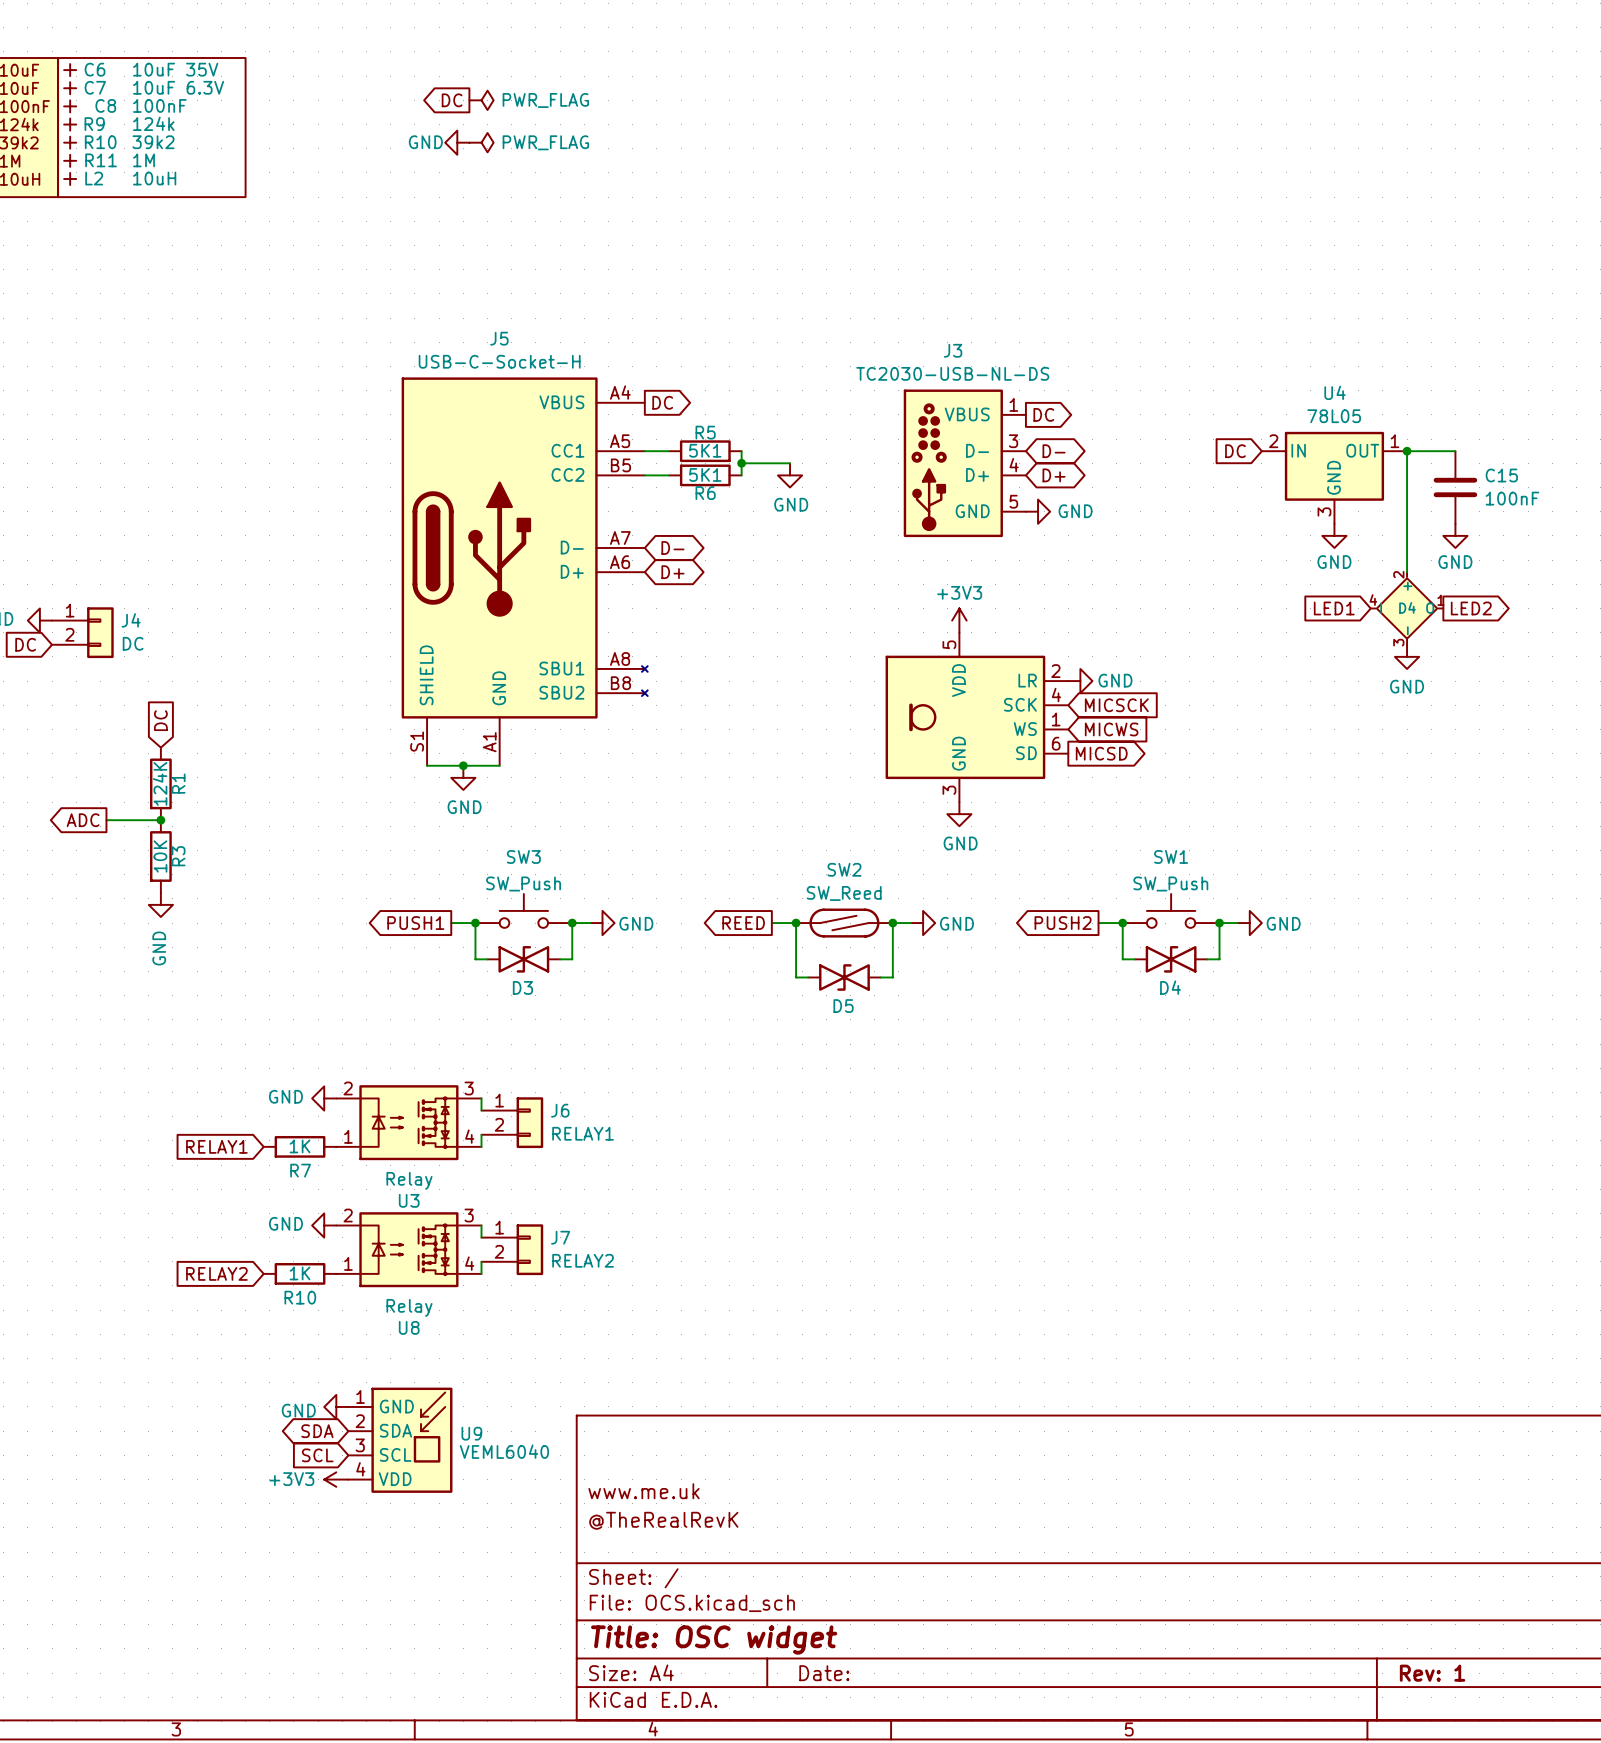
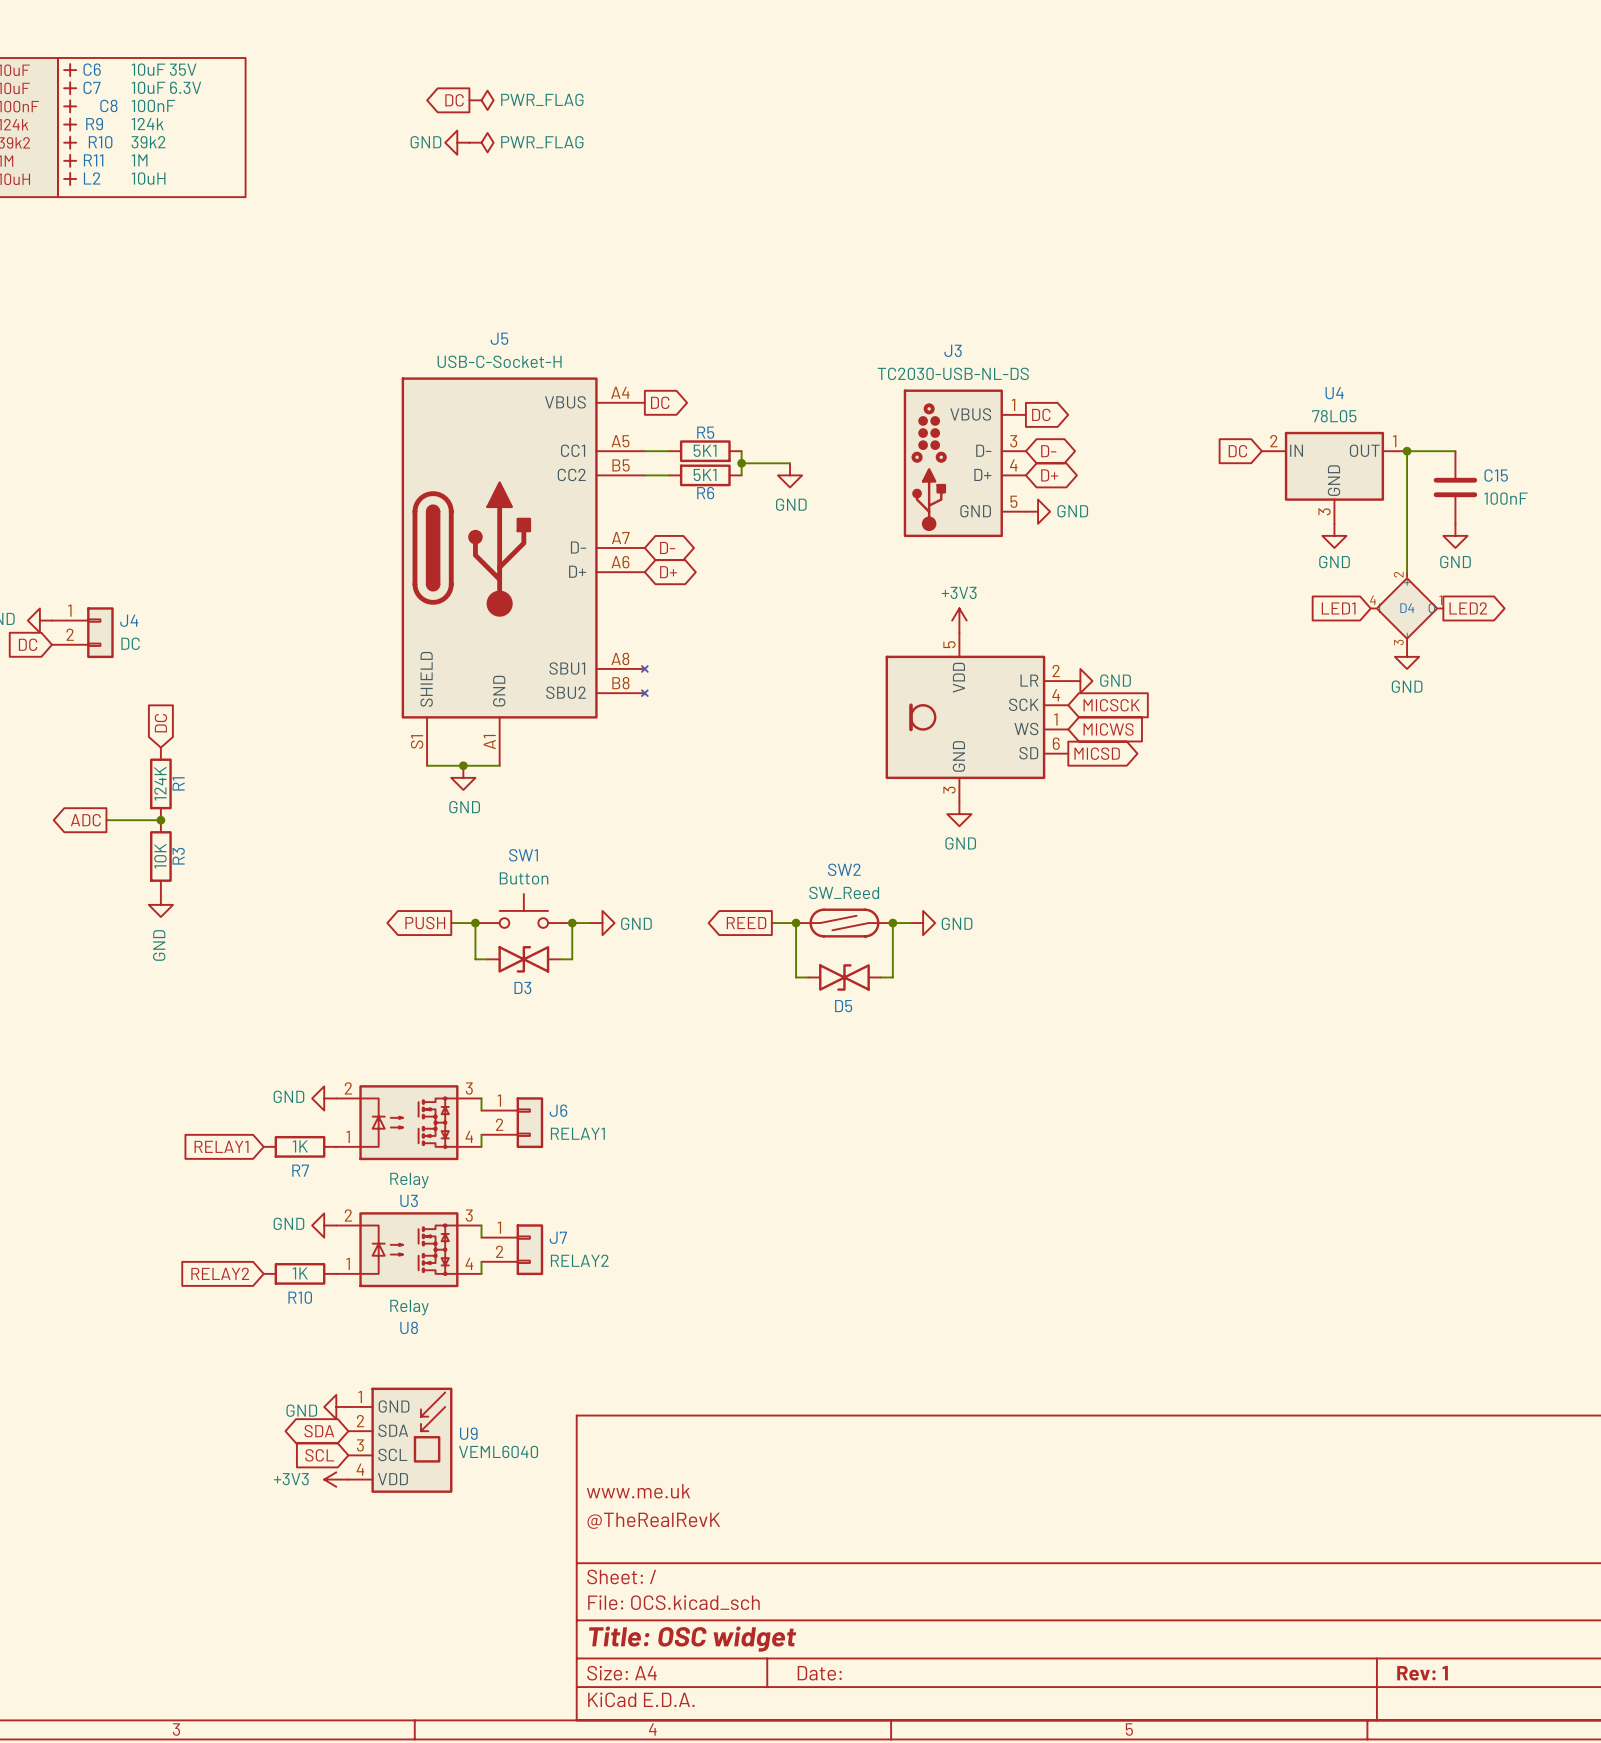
SW3 name: SW3 (523, 856) -> SW1 (523, 855)
SW3 value: SW_Push (523, 883) -> Button (524, 878)
SW1: SW_Push (1171, 910) -> none
global label: PUSH1 (415, 923) -> PUSH (425, 923)
global label: PUSH2 (1063, 923) -> none
wire: (1098, 923) (1122, 923) (1122, 959) (1134, 959) -> none
junction: (1122, 923) -> none
junction: (1219, 923) -> none
wire: (1237, 923) (1219, 923) (1219, 959) (1207, 959) -> none
power symbol: GND (1249, 923) -> none
D4: (1171, 959) -> none

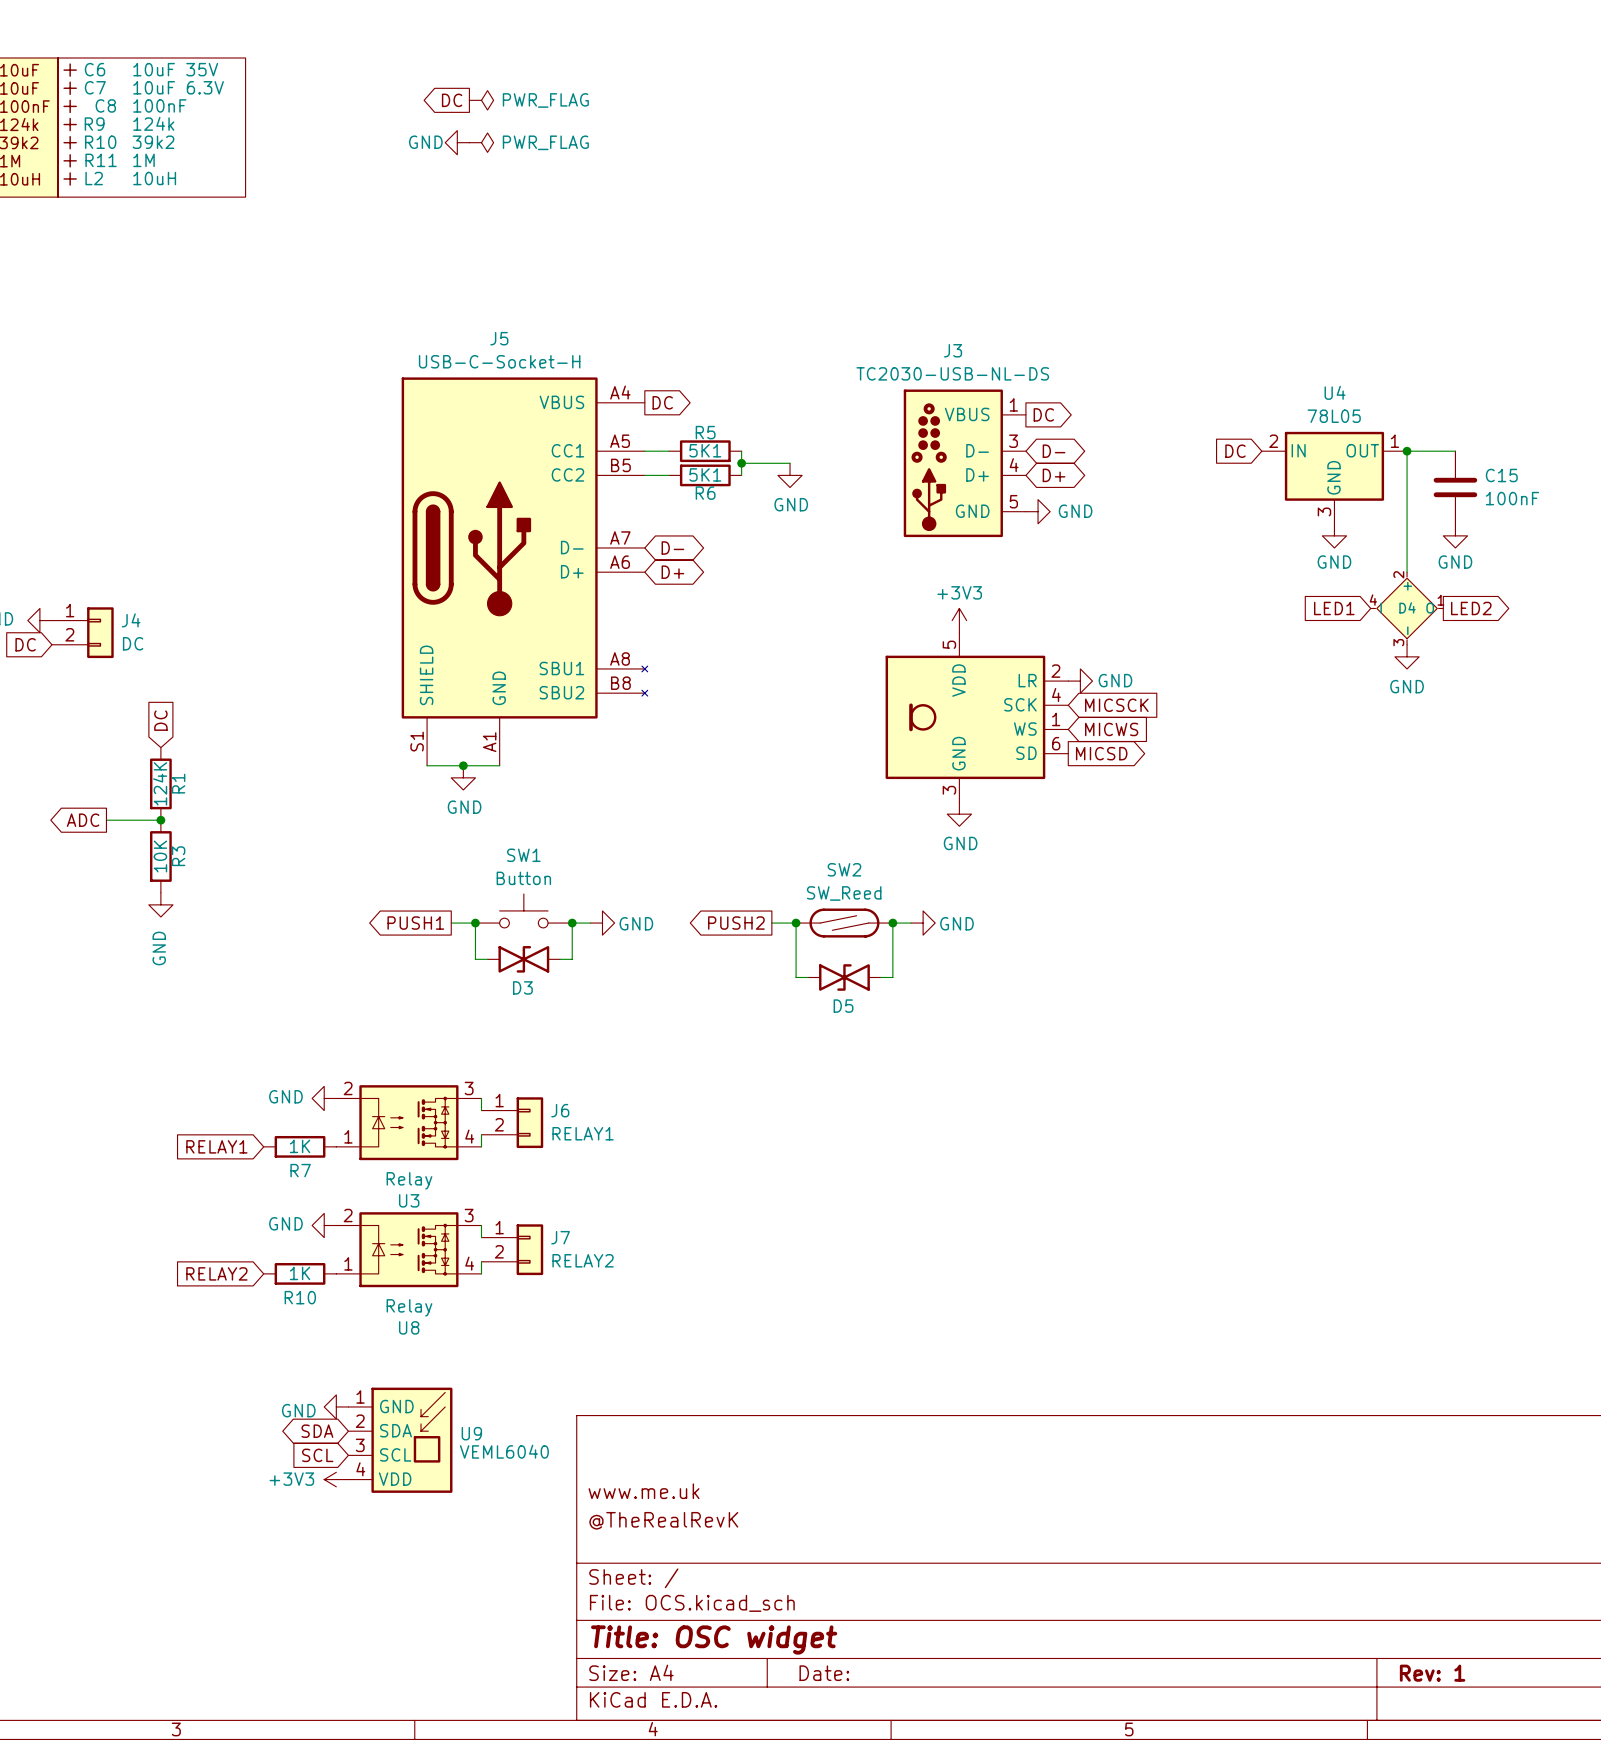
global label: PUSH (425, 923) -> PUSH1 (415, 923)
global label: REED (746, 923) -> PUSH2 (736, 923)

